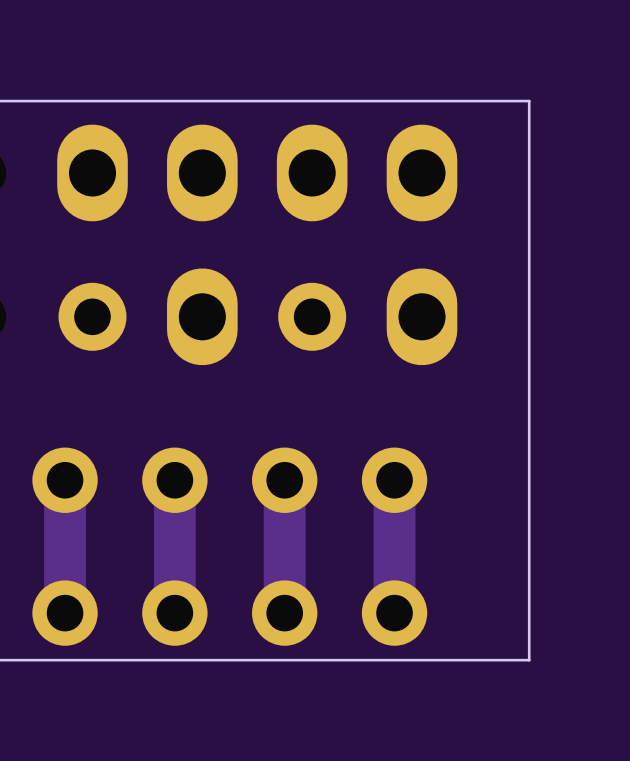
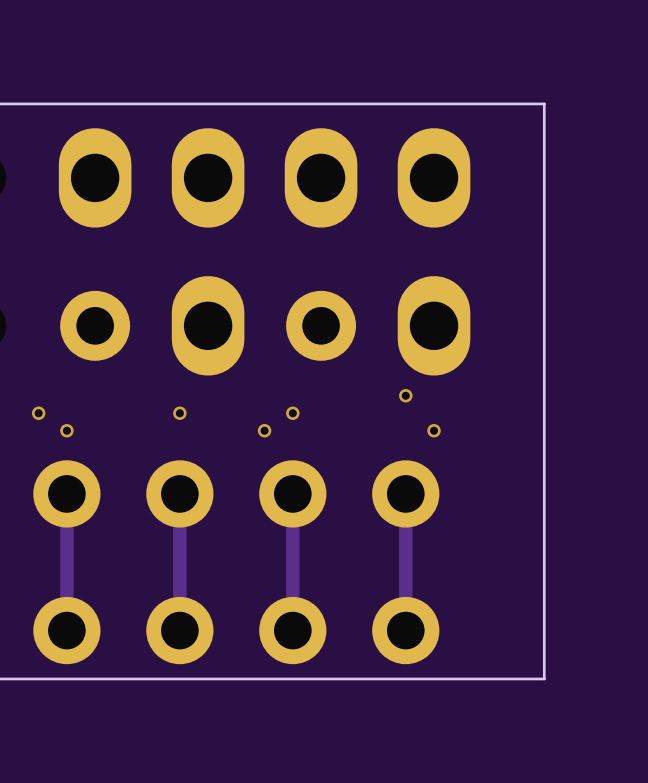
via: none -> (405, 395)
via: none -> (38, 413)
via: none -> (179, 413)
via: none -> (292, 413)
via: none -> (66, 430)
via: none -> (264, 430)
via: none -> (434, 430)
track width: thick (65, 480) (65, 613) -> thin (66, 493) (66, 630)
track width: thick (174, 480) (174, 613) -> thin (179, 493) (179, 630)
track width: thick (284, 480) (284, 613) -> thin (292, 493) (292, 630)
track width: thick (394, 480) (394, 613) -> thin (405, 493) (405, 630)

